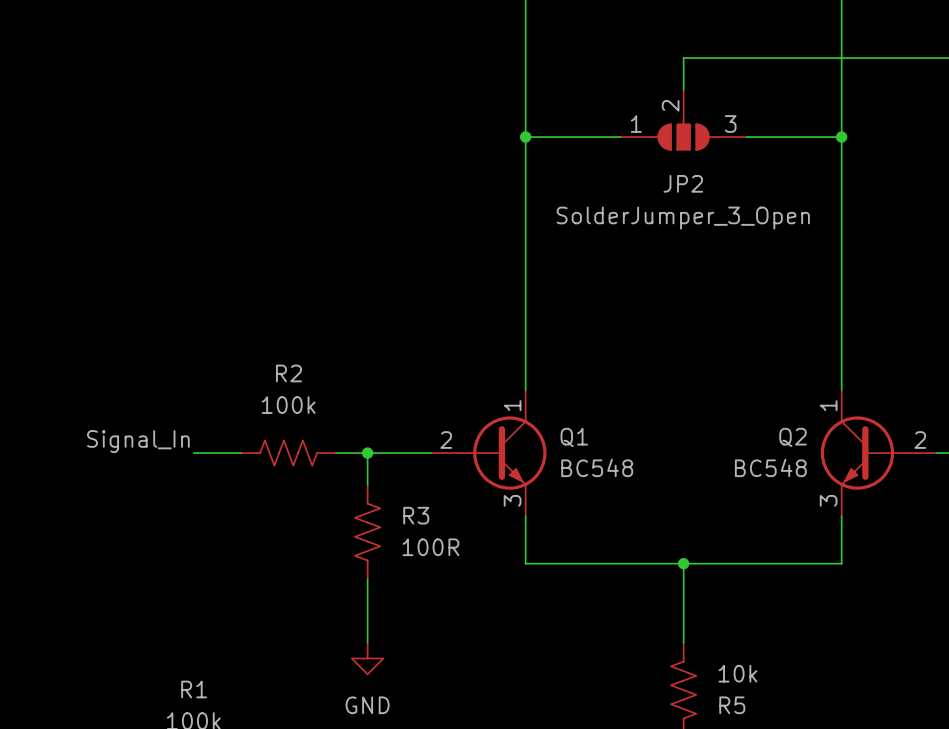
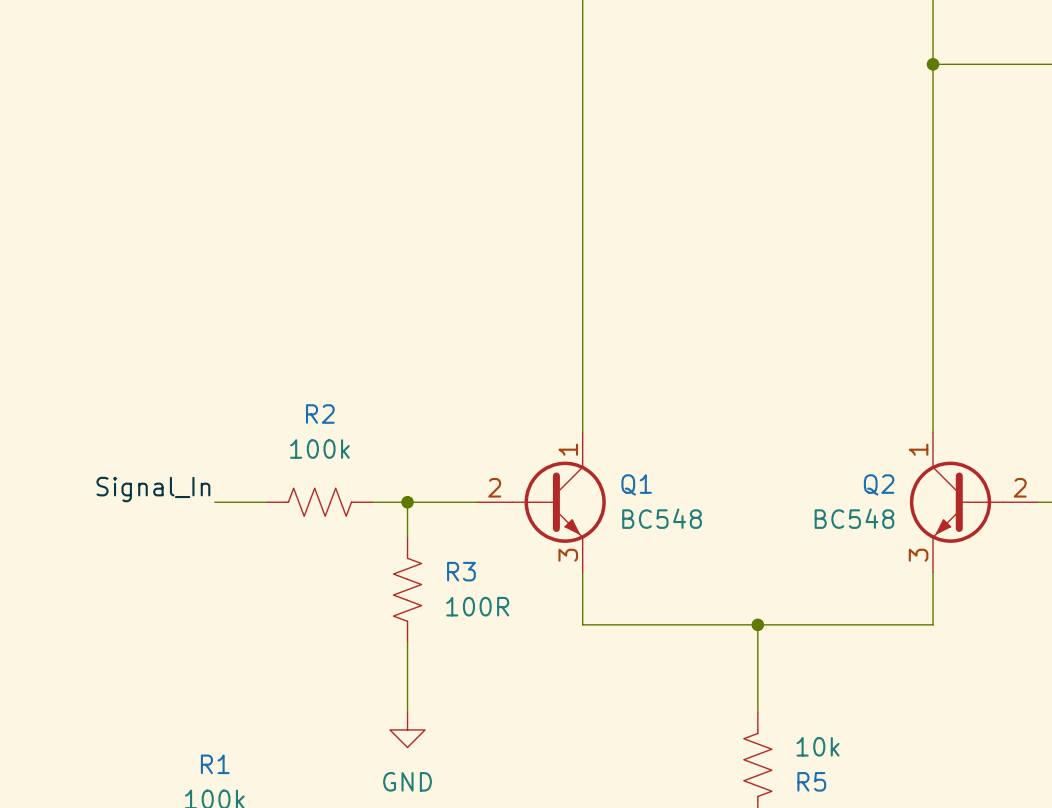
wire: (841, 58) (683, 58) (683, 89) -> none
junction: none -> (933, 64)
JP2: SolderJumper_3_Open (683, 120) -> none
wire: (525, 137) (620, 137) -> none
junction: (525, 137) -> none
wire: (746, 137) (841, 137) -> none
junction: (841, 137) -> none

